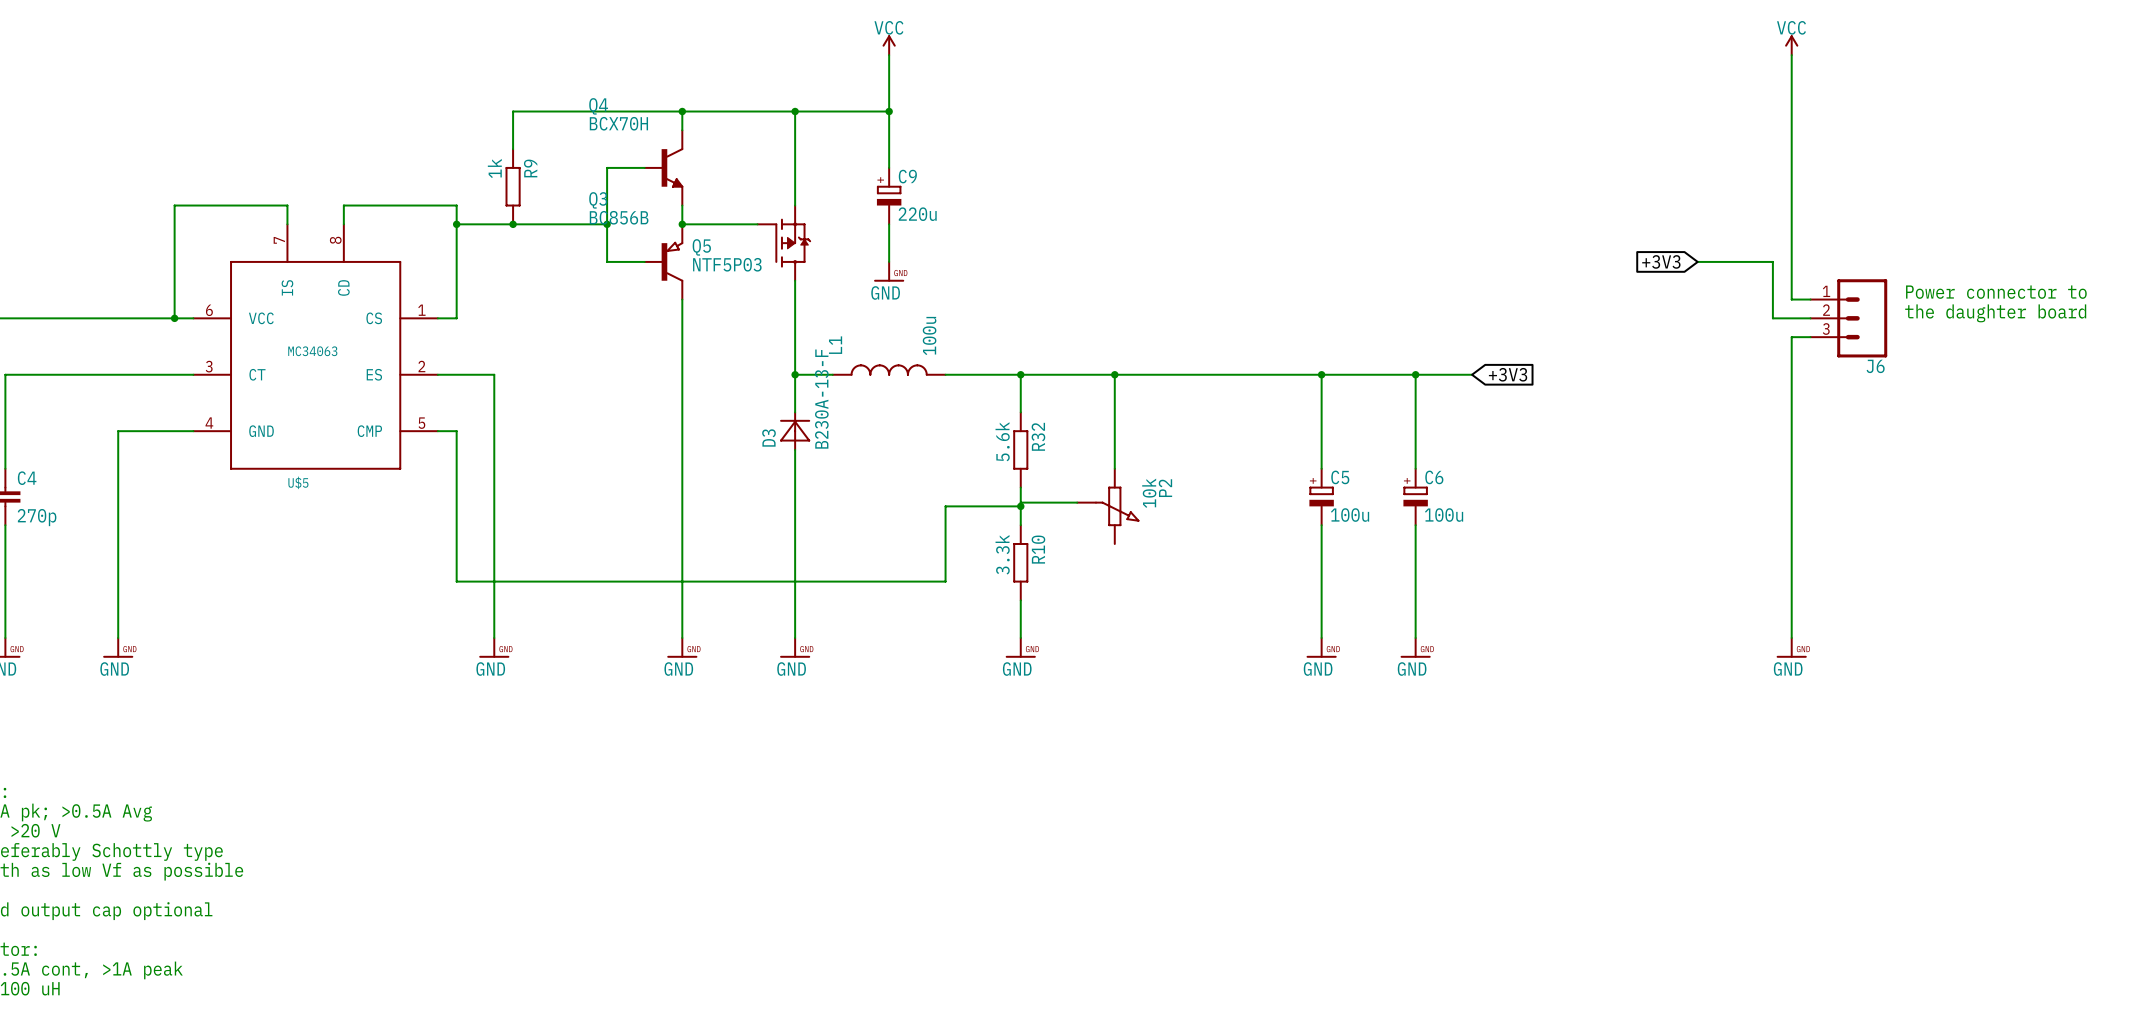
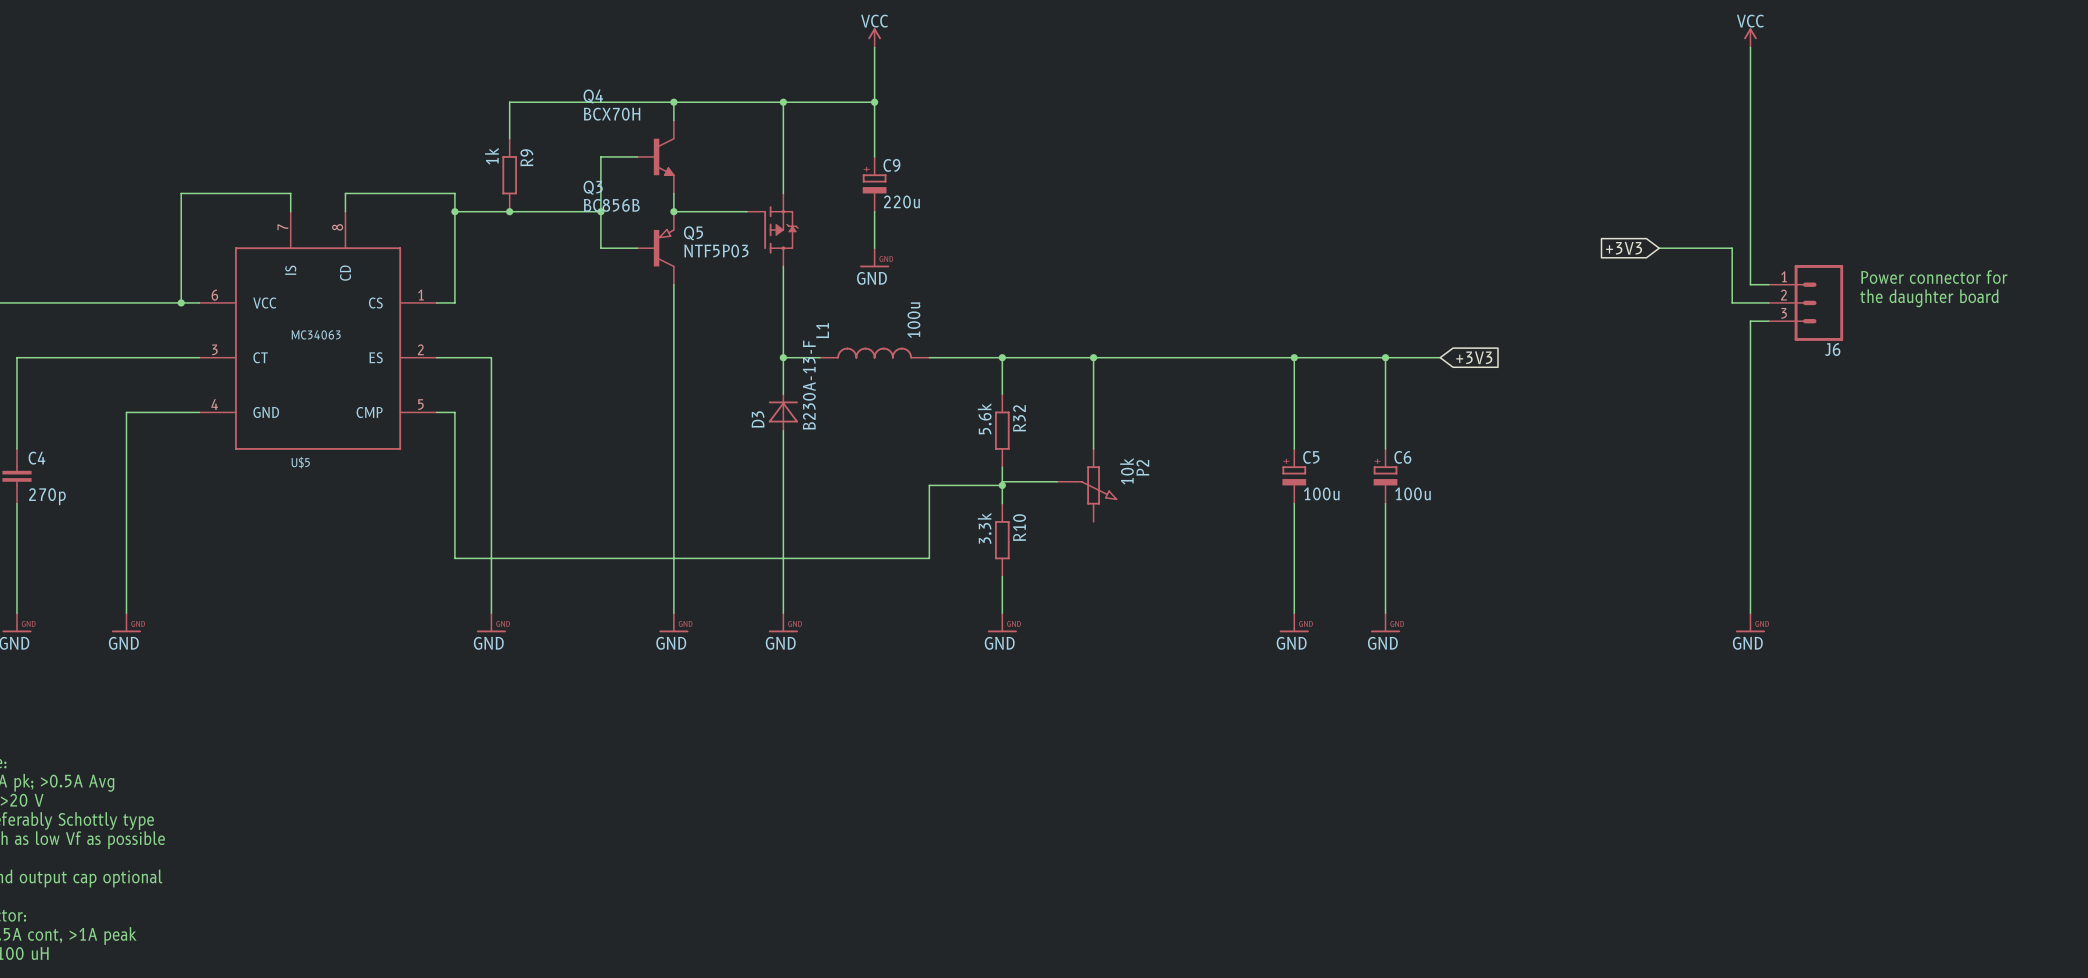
text: Power connector to (1996, 292) -> Power connector for (1934, 277)

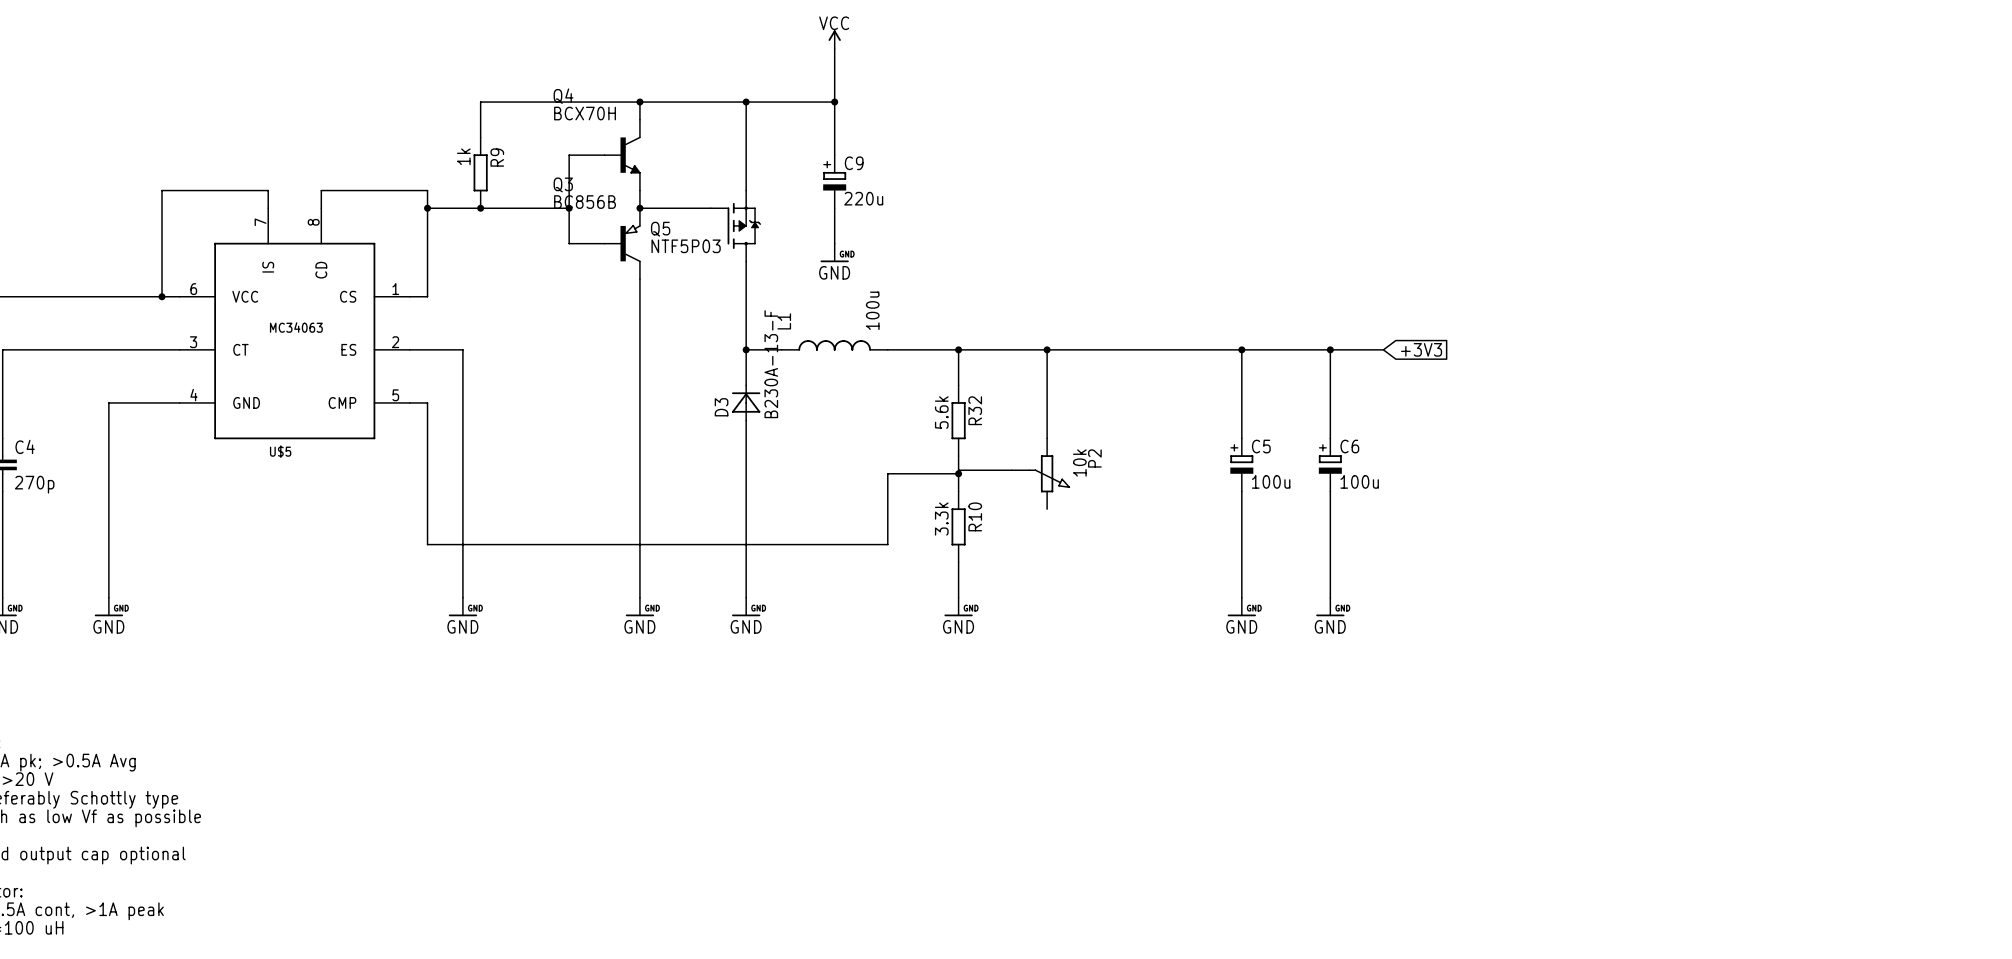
power symbol: VCC (1750, 37) -> none
wire: (1750, 47) (1750, 284) (1768, 284) -> none
global label: +3V3 (1624, 248) -> none
wire: (1659, 248) (1732, 248) (1732, 302) (1768, 302) -> none
text: Power connector for (1934, 277) -> none
text: the daughter board (1929, 298) -> none
J6: (1805, 302) -> none
wire: (1768, 321) (1750, 321) (1750, 613) -> none
power symbol: GND (1750, 622) -> none

